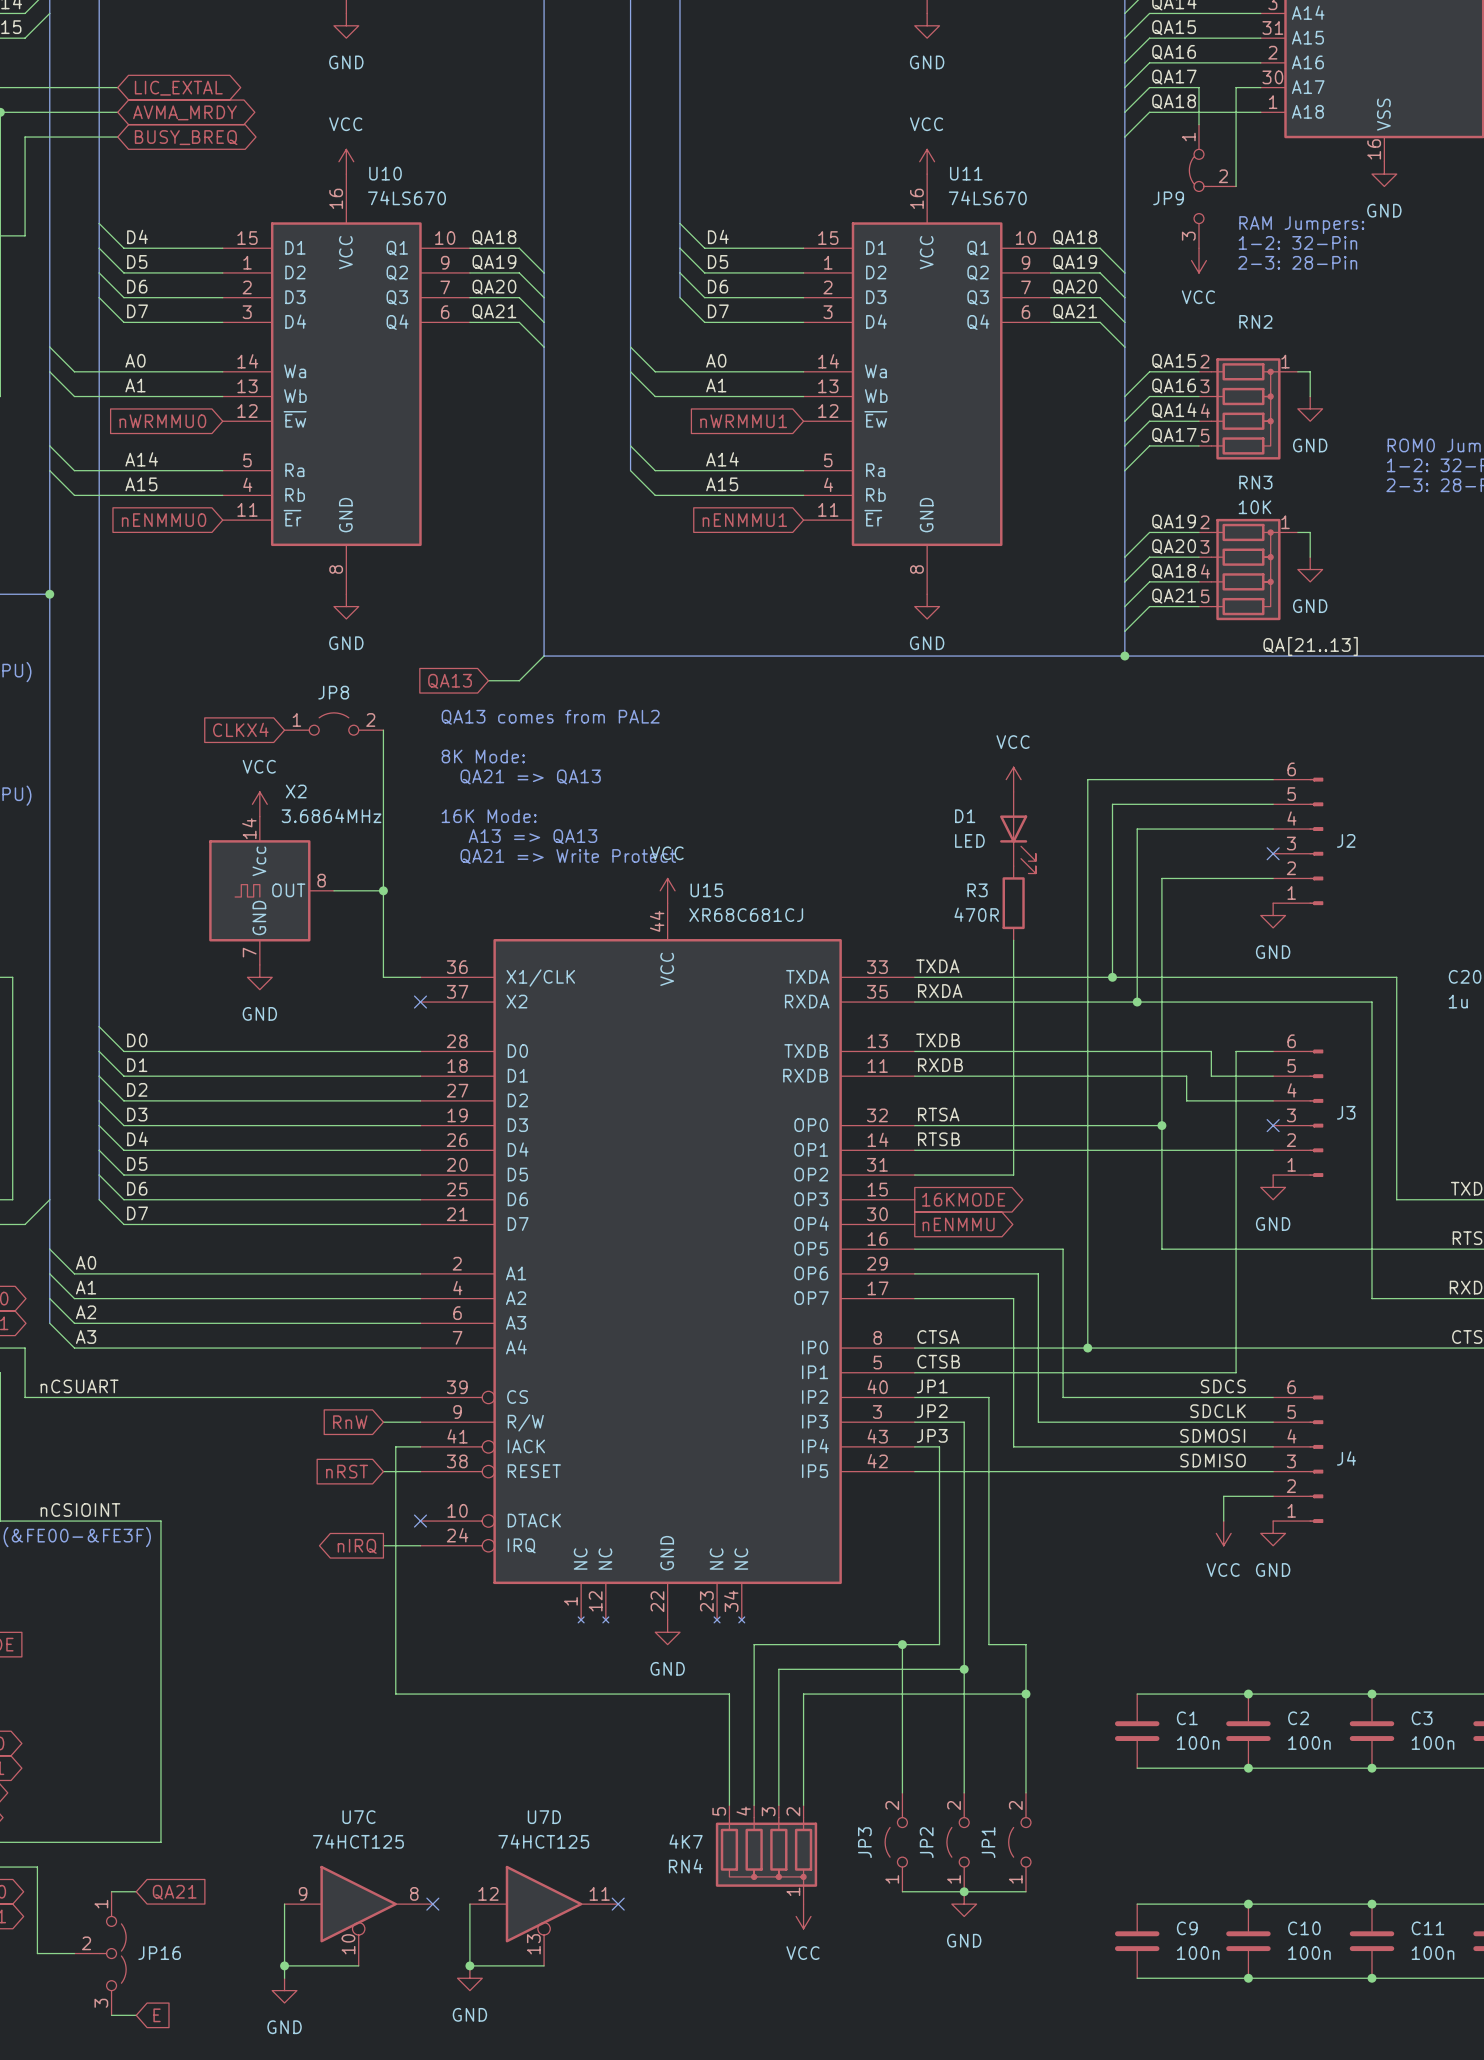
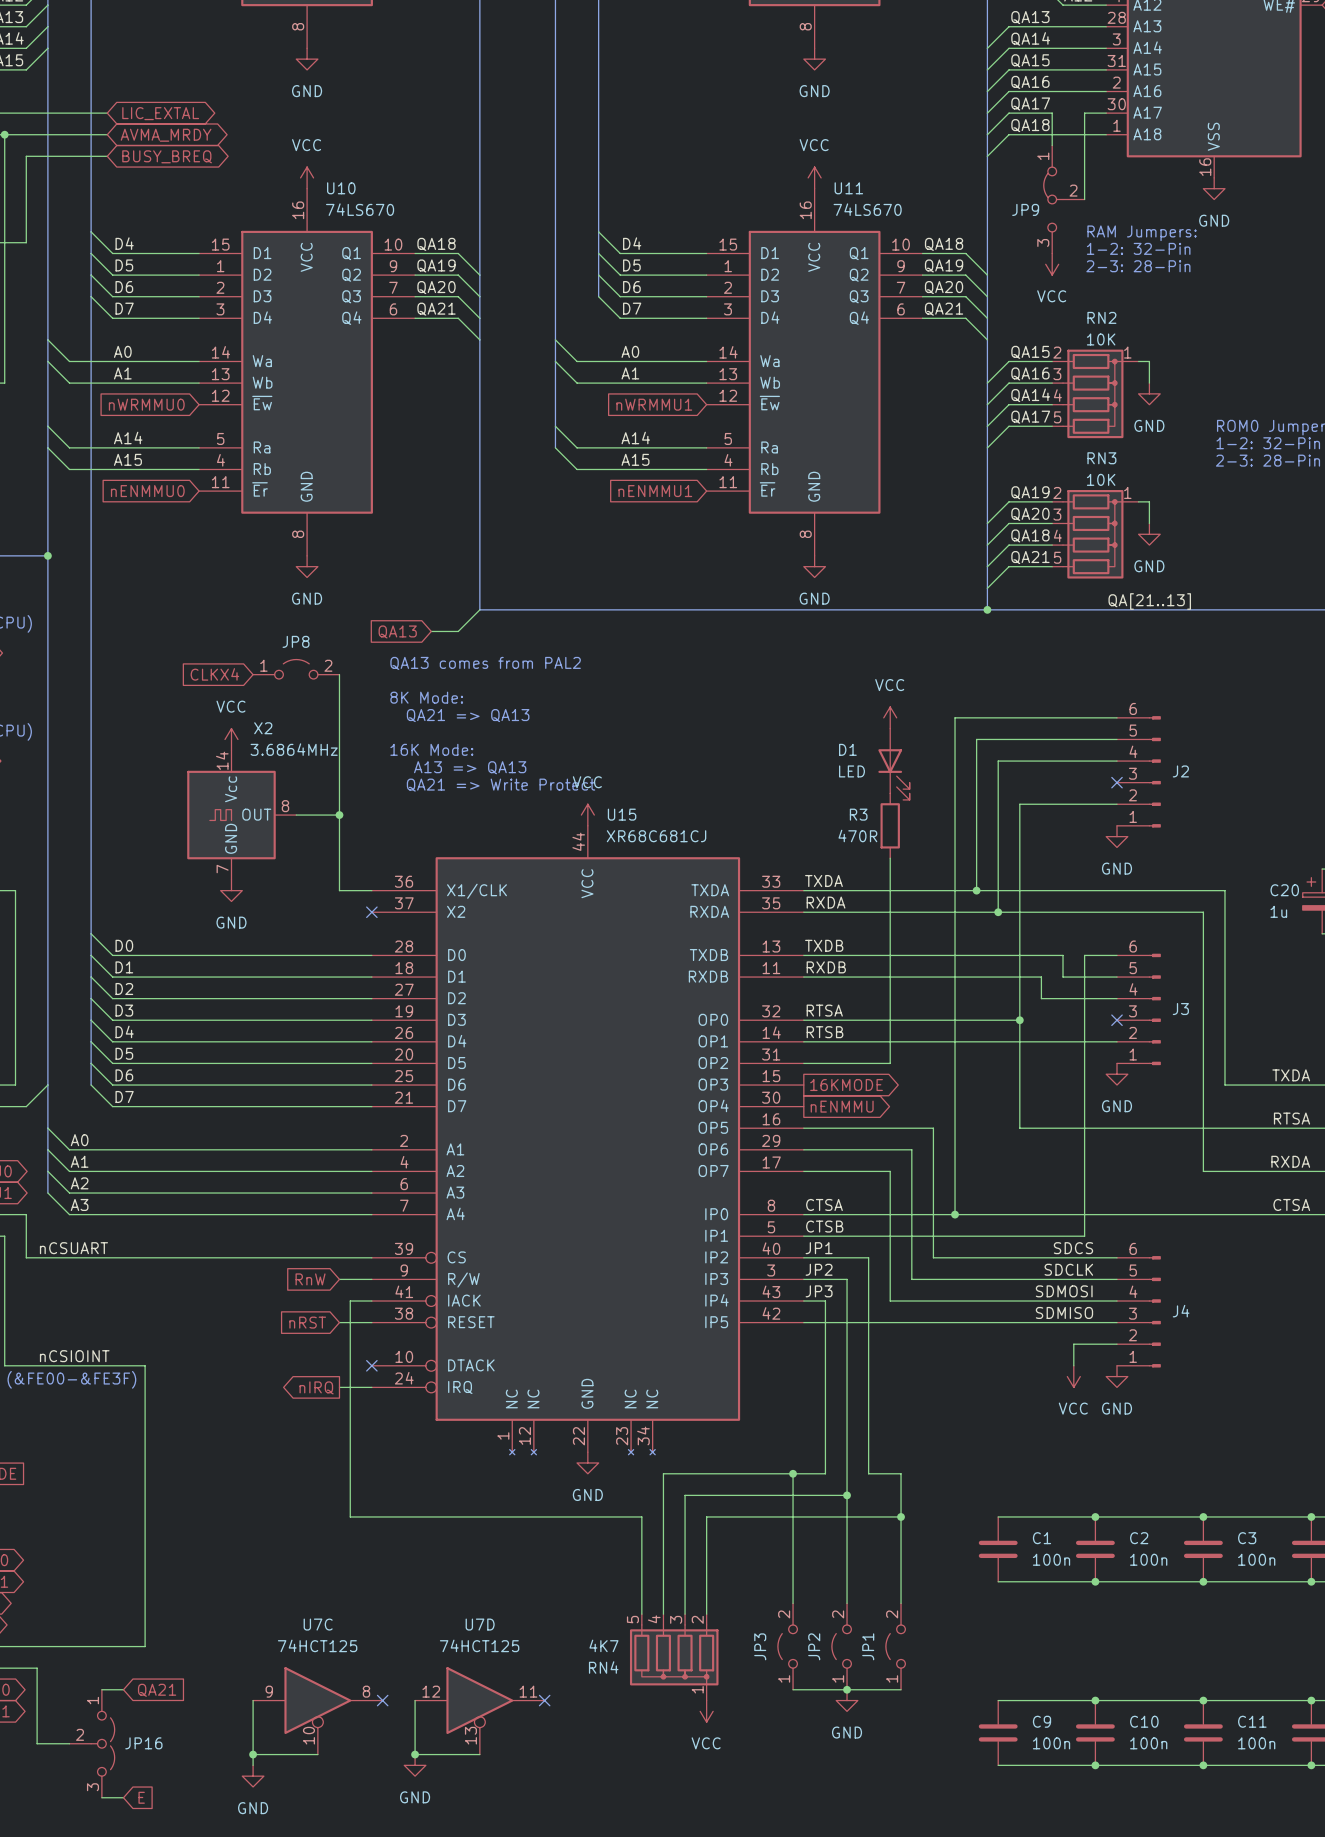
RN2 value: none -> 10K (1101, 339)

